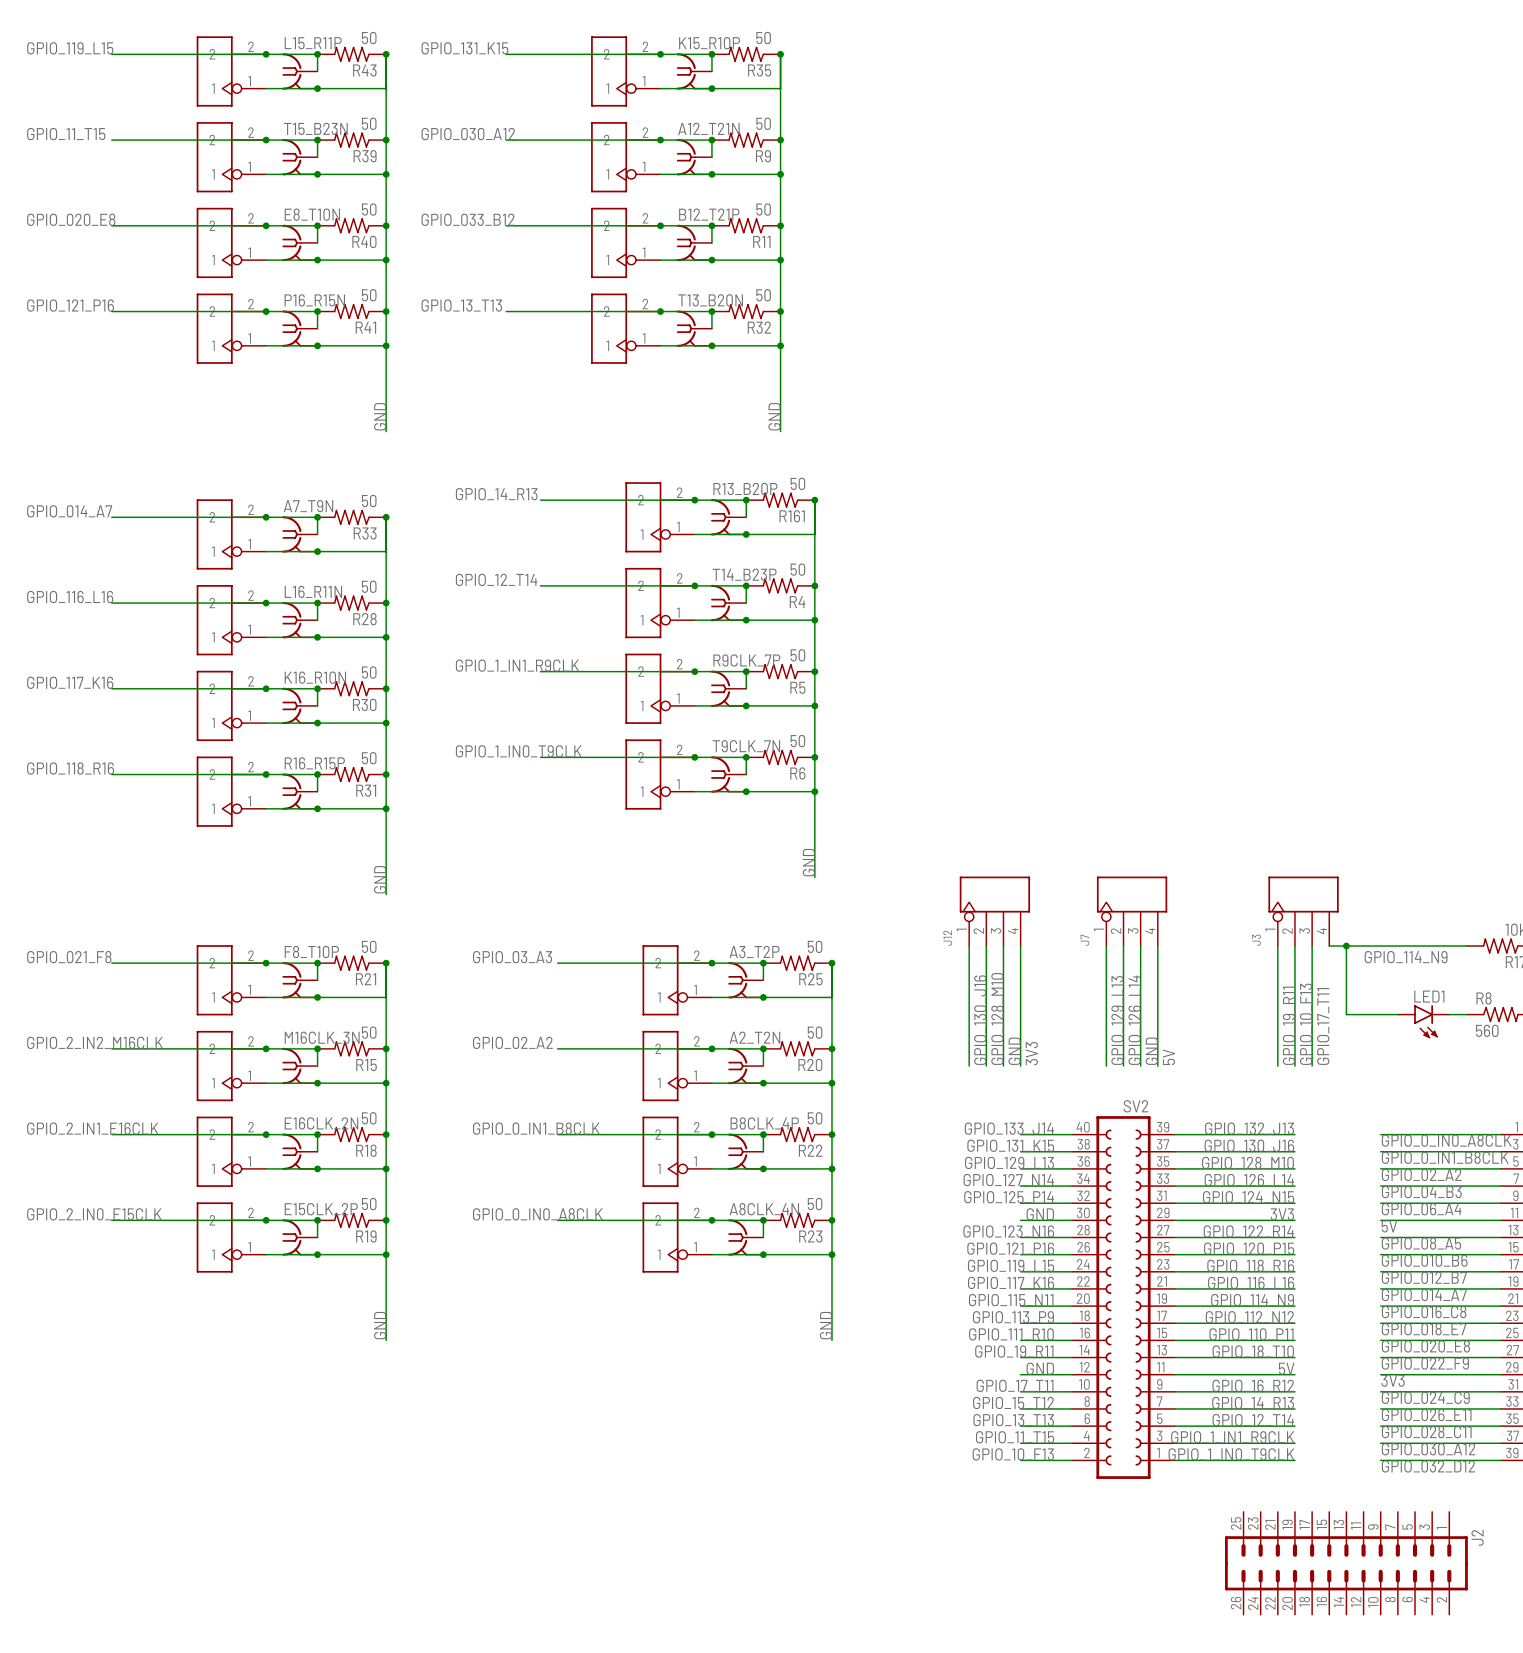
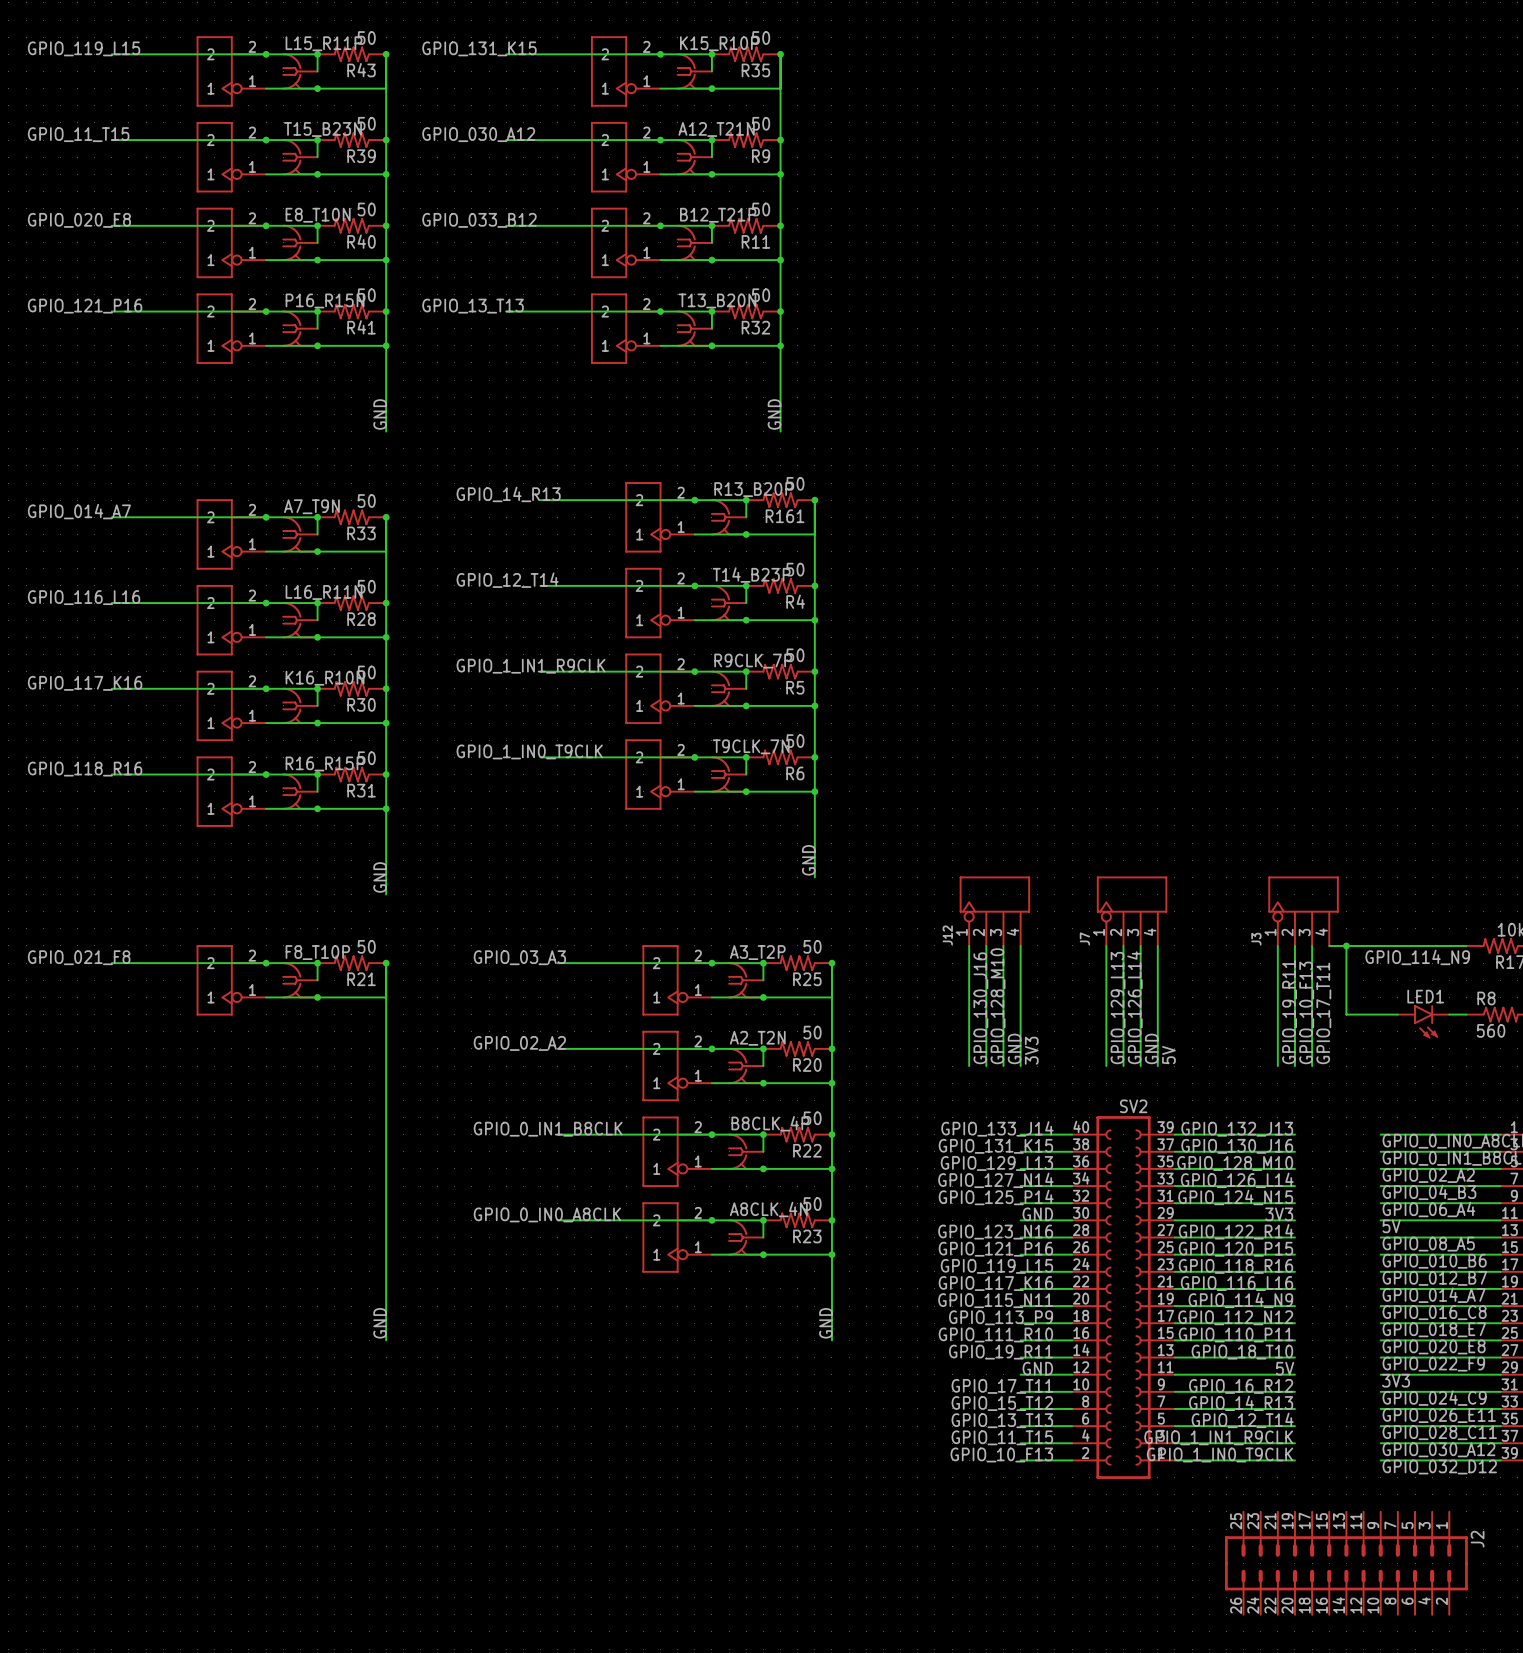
label: GPIO_2_IN2_M16CLK (95, 1042) -> none
wire: (111, 1048) (317, 1048) (317, 1066) -> none
junction: (266, 1048) -> none
junction: (317, 1048) -> none
R15: 50 (351, 1048) -> none
junction: (386, 1048) -> none
part: (231, 1066) -> none
M16CLK_3N: (299, 1066) -> none
wire: (266, 1083) (386, 1083) -> none
junction: (317, 1083) -> none
junction: (386, 1083) -> none
label: GPIO_2_IN1_E16CLK (92, 1128) -> none
wire: (111, 1134) (317, 1134) (317, 1151) -> none
junction: (266, 1134) -> none
junction: (317, 1134) -> none
R18: 50 (351, 1134) -> none
junction: (386, 1134) -> none
part: (231, 1151) -> none
E16CLK_2N: (299, 1151) -> none
wire: (266, 1168) (386, 1168) -> none
junction: (317, 1168) -> none
junction: (386, 1168) -> none
label: GPIO_2_IN0_E15CLK (94, 1214) -> none
wire: (111, 1220) (317, 1220) (317, 1237) -> none
junction: (266, 1220) -> none
junction: (317, 1220) -> none
R19: 50 (351, 1220) -> none
junction: (386, 1220) -> none
part: (231, 1237) -> none
E15CLK_2P: (299, 1237) -> none
wire: (266, 1254) (386, 1254) -> none
junction: (317, 1254) -> none
junction: (386, 1254) -> none

